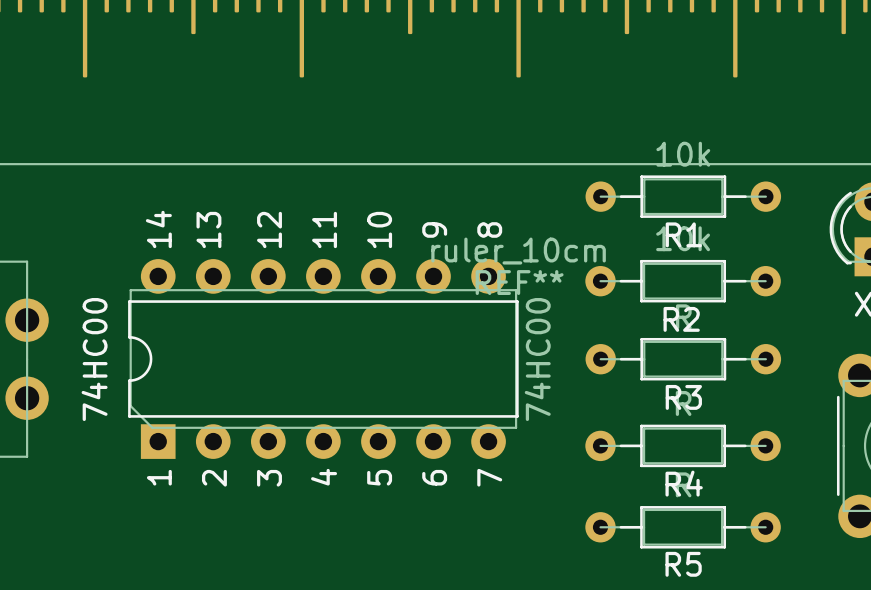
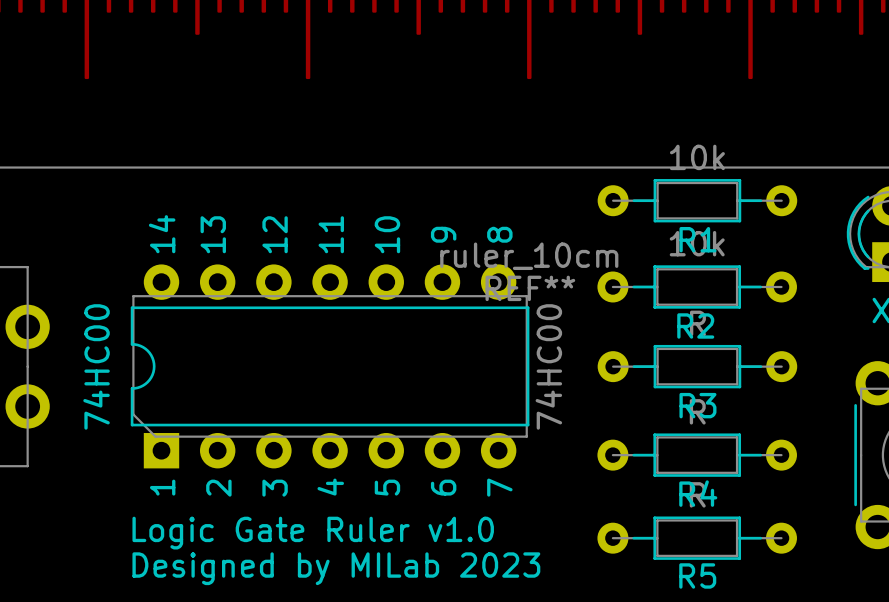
text: none -> Logic Gate Ruler v1.0 (313, 533)
text: none -> Designed by MILab 2023 (336, 568)

